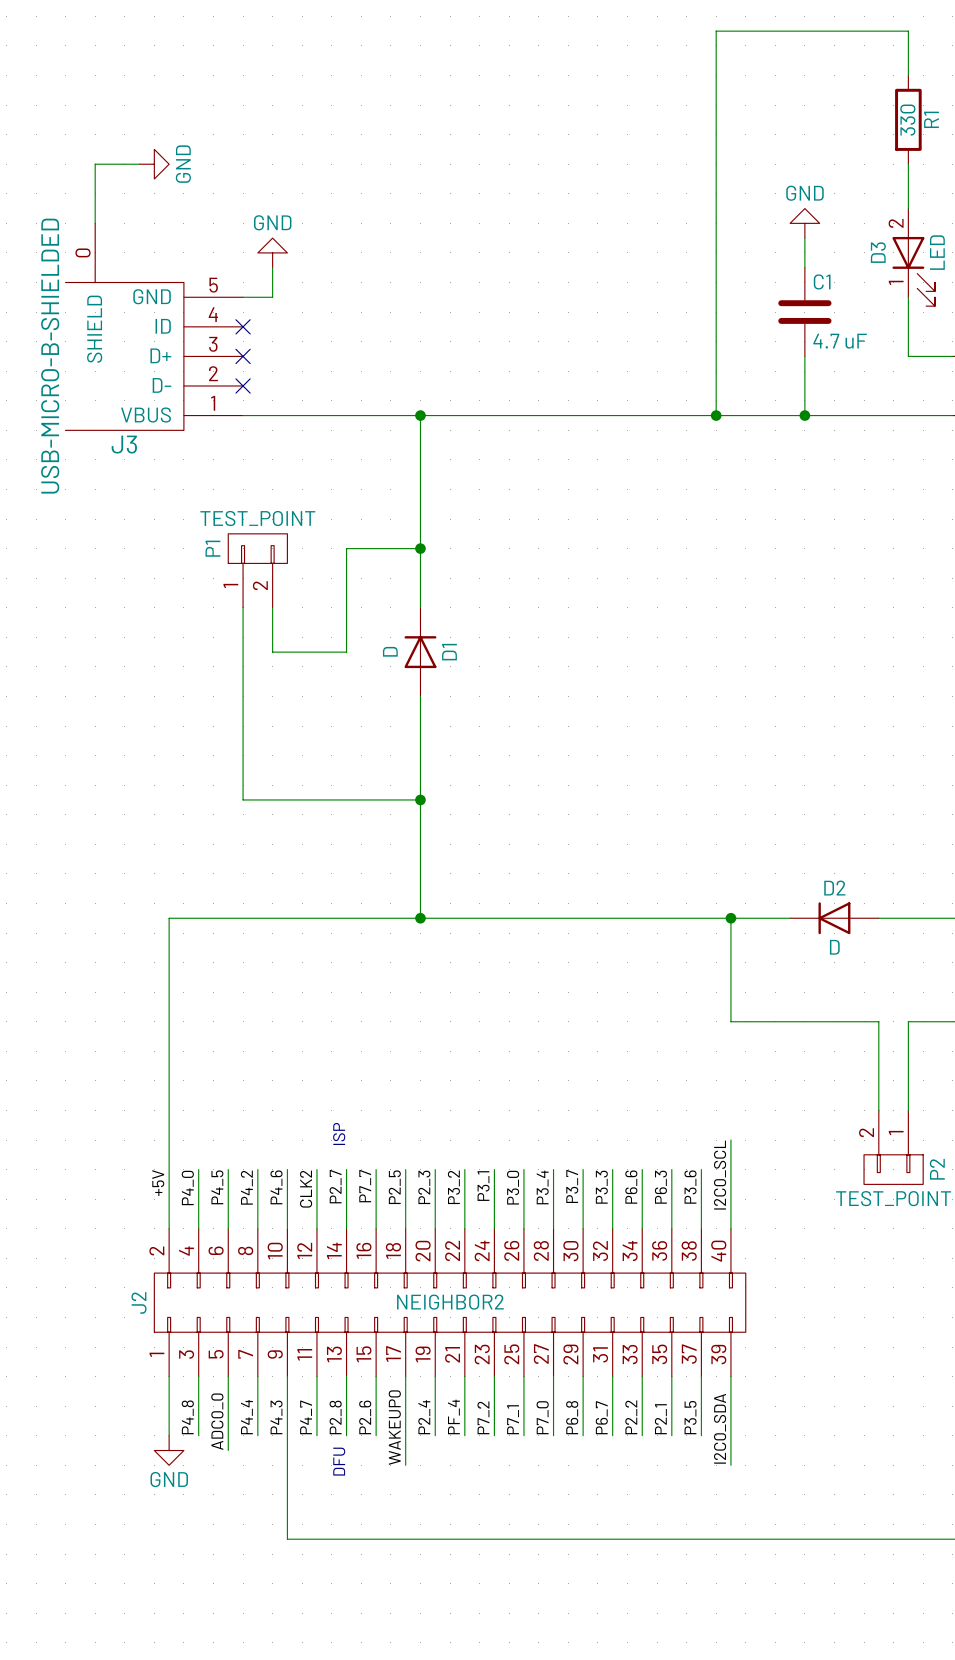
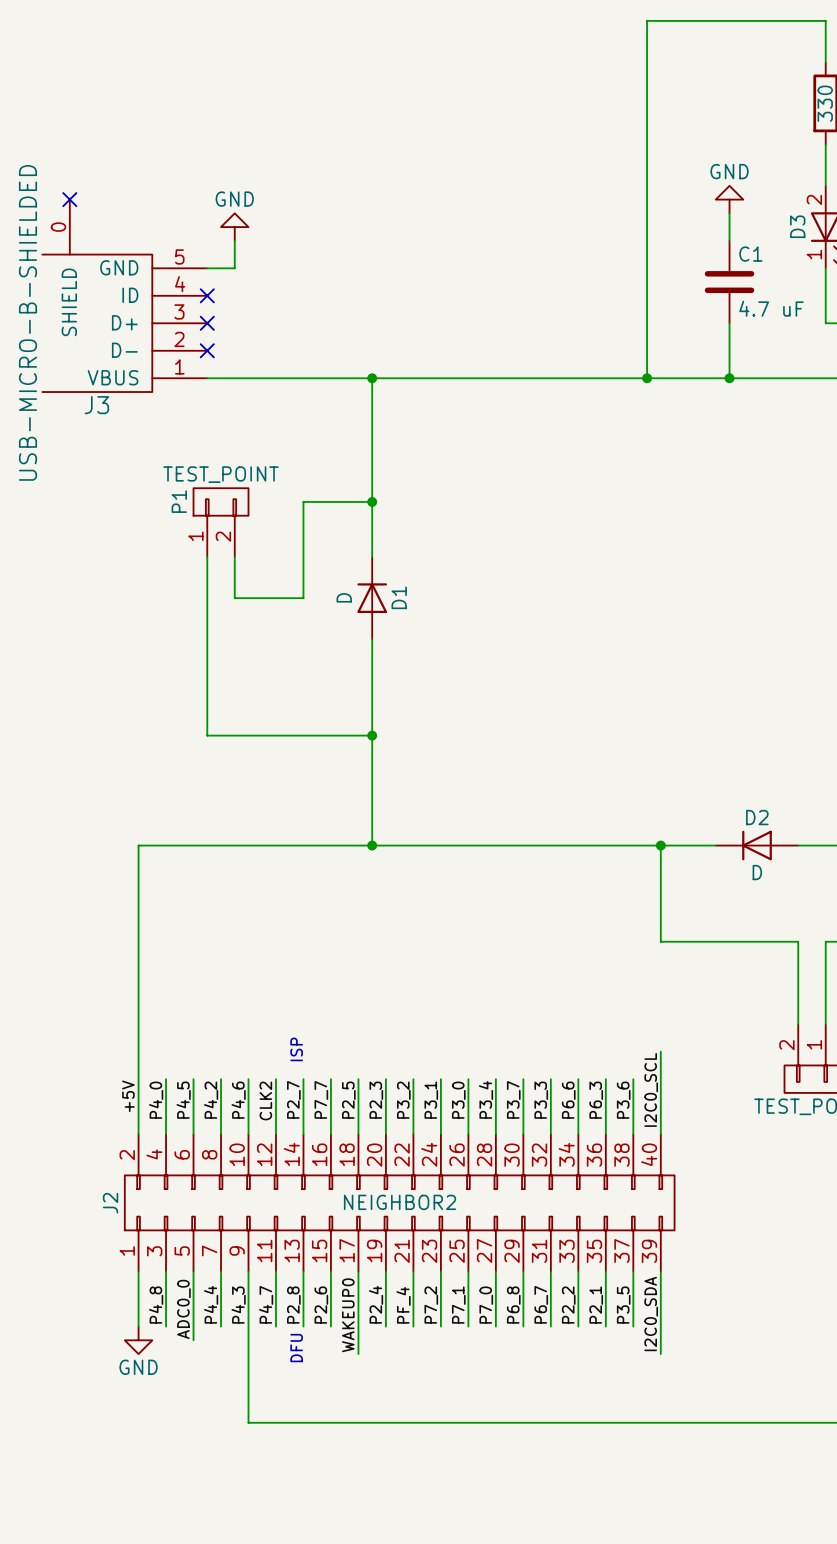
wire: (139, 164) (95, 164) (95, 223) -> none
power symbol: GND (154, 164) -> none
no-connect mark: none -> (69, 199)

